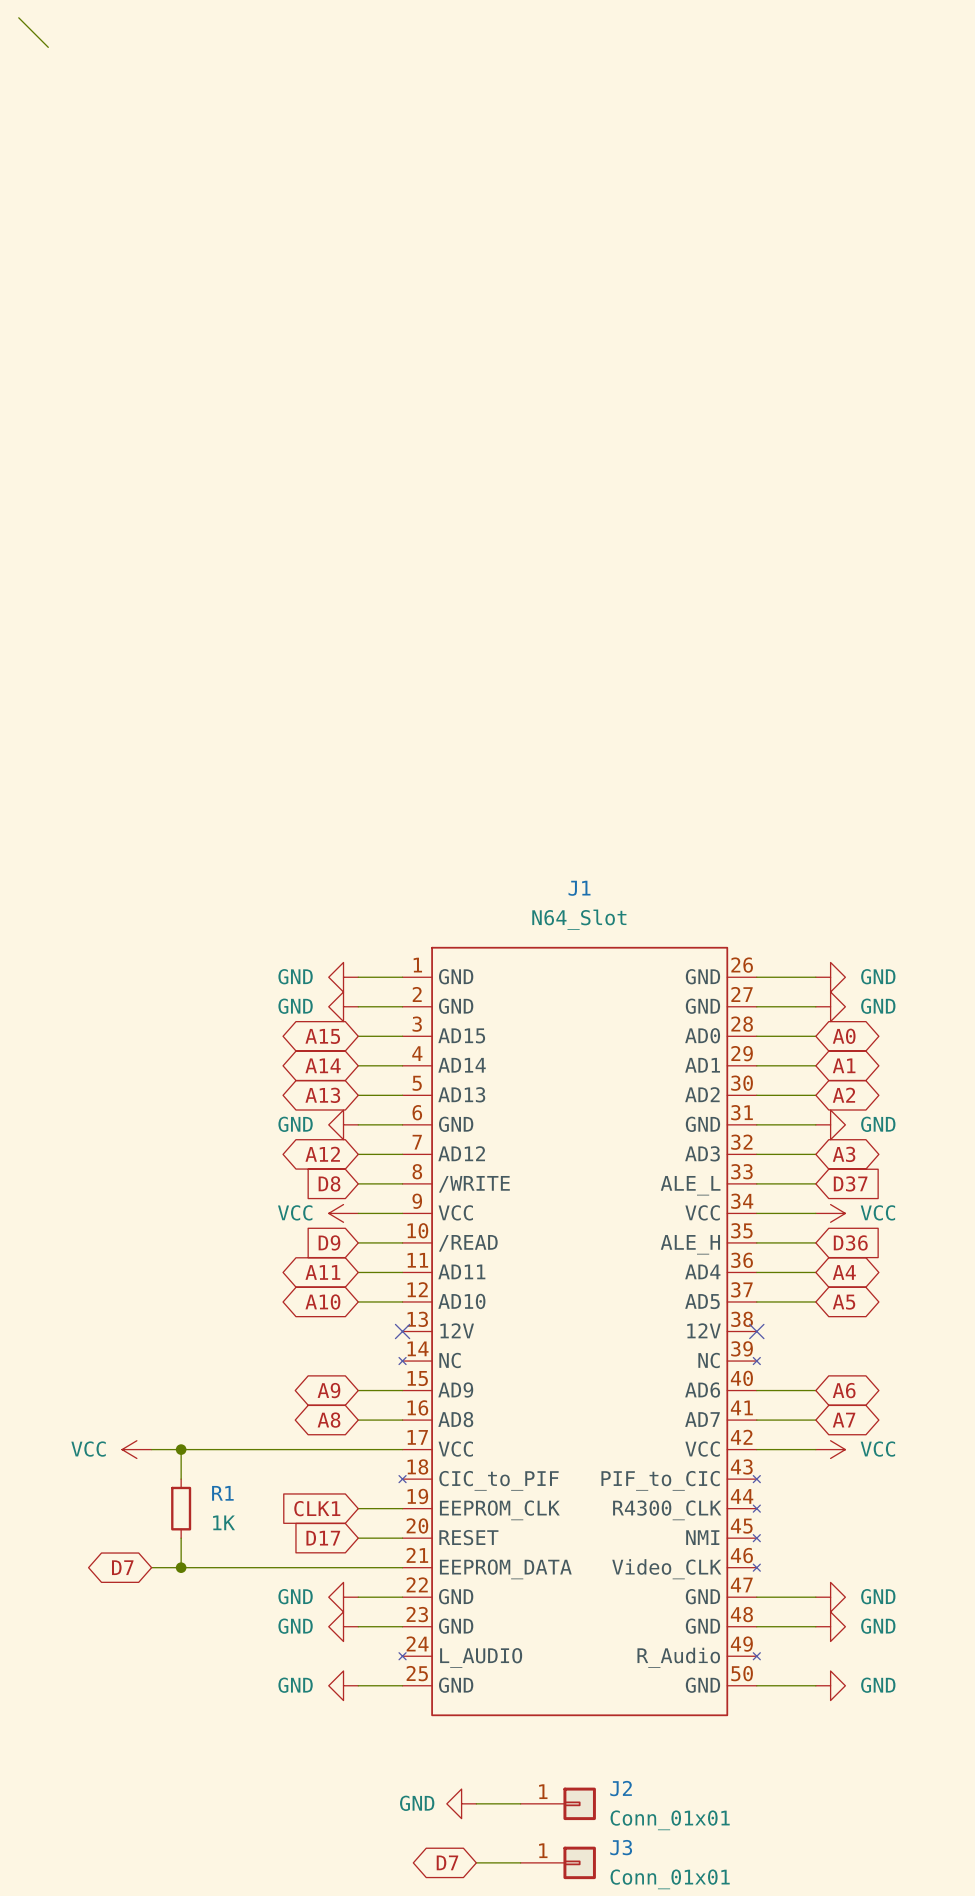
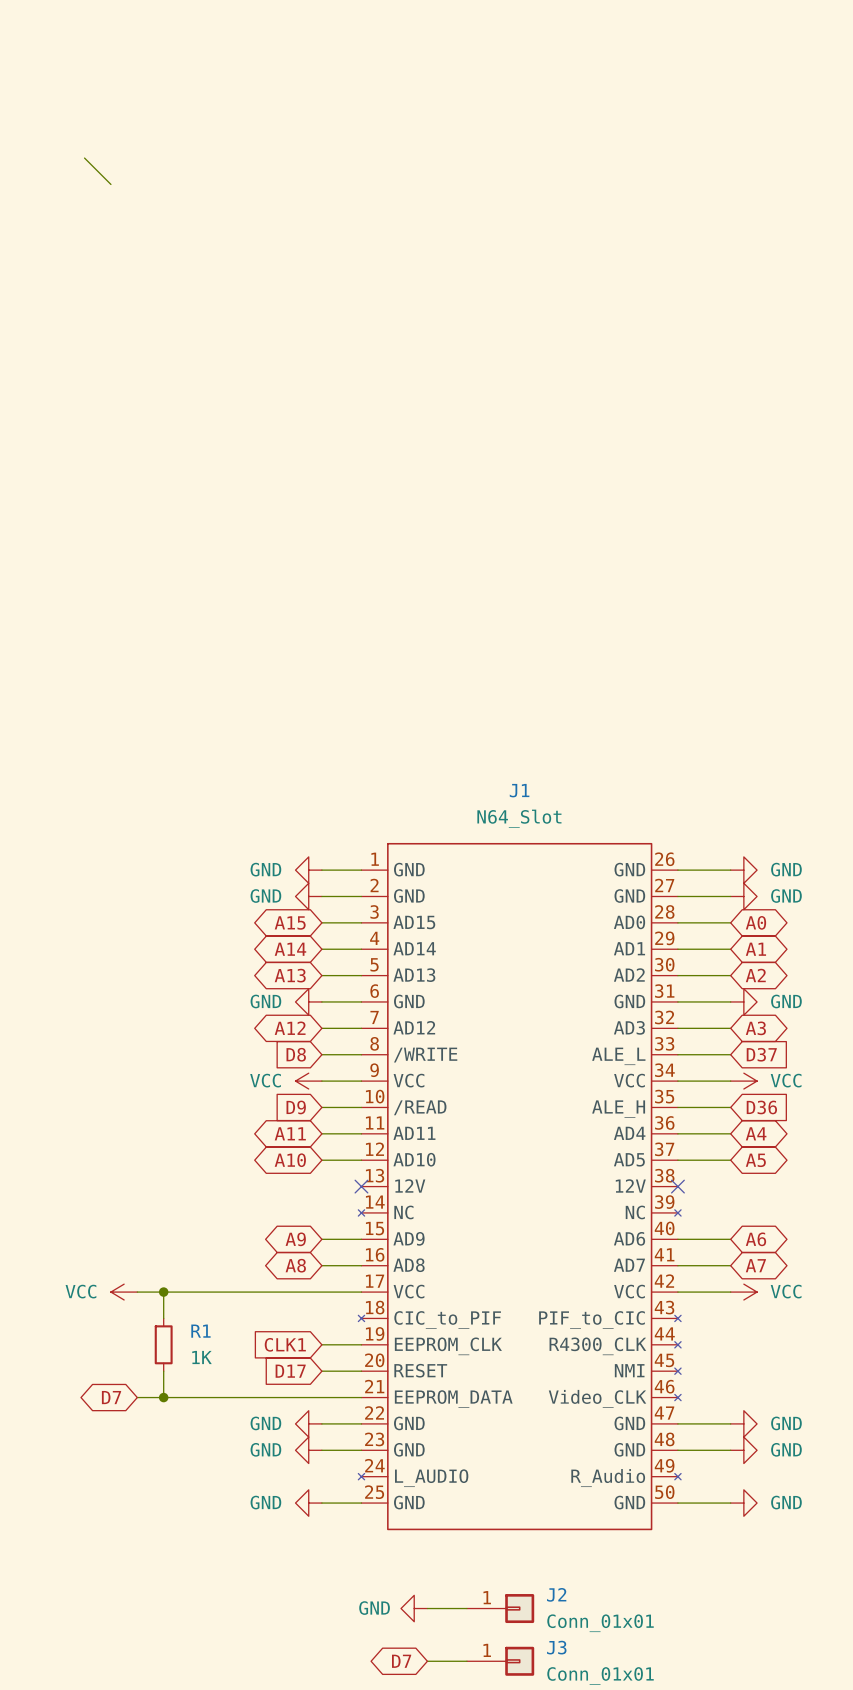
wire: (18, 17) (48, 47) -> (84, 158) (110, 184)

